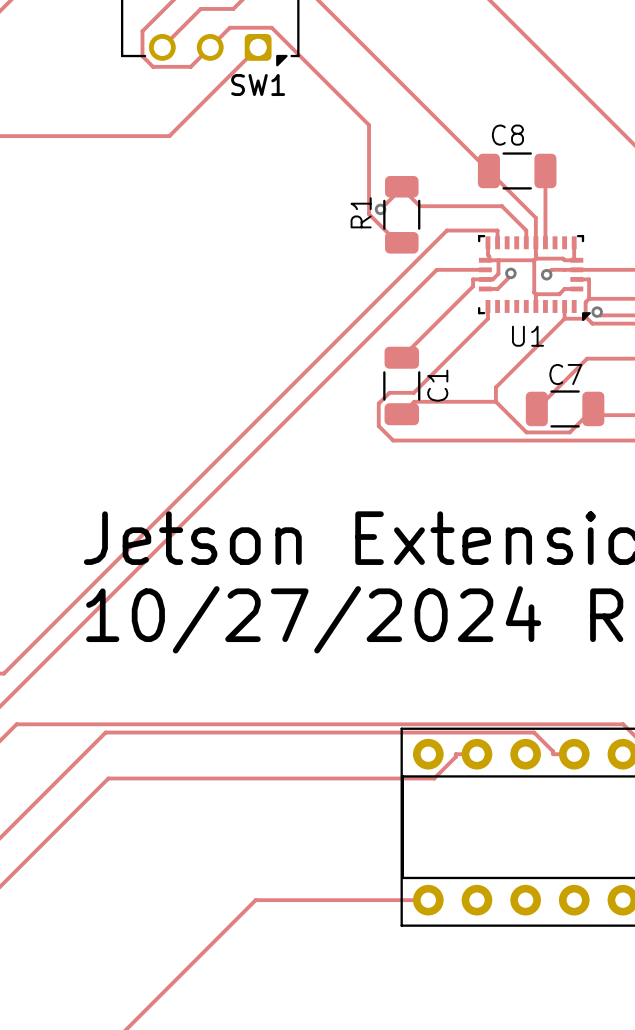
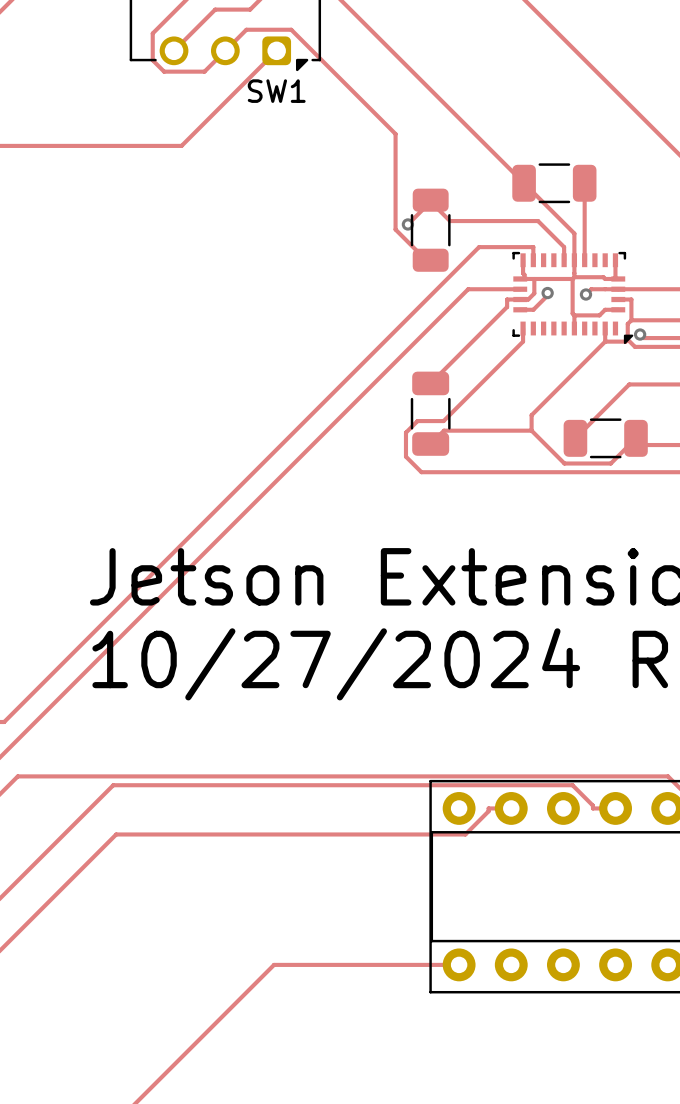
text: C8 (507, 135) -> none
text: R1 (361, 212) -> none
text: U1 (528, 336) -> none
text: C7 (565, 374) -> none
text: C1 (437, 385) -> none

